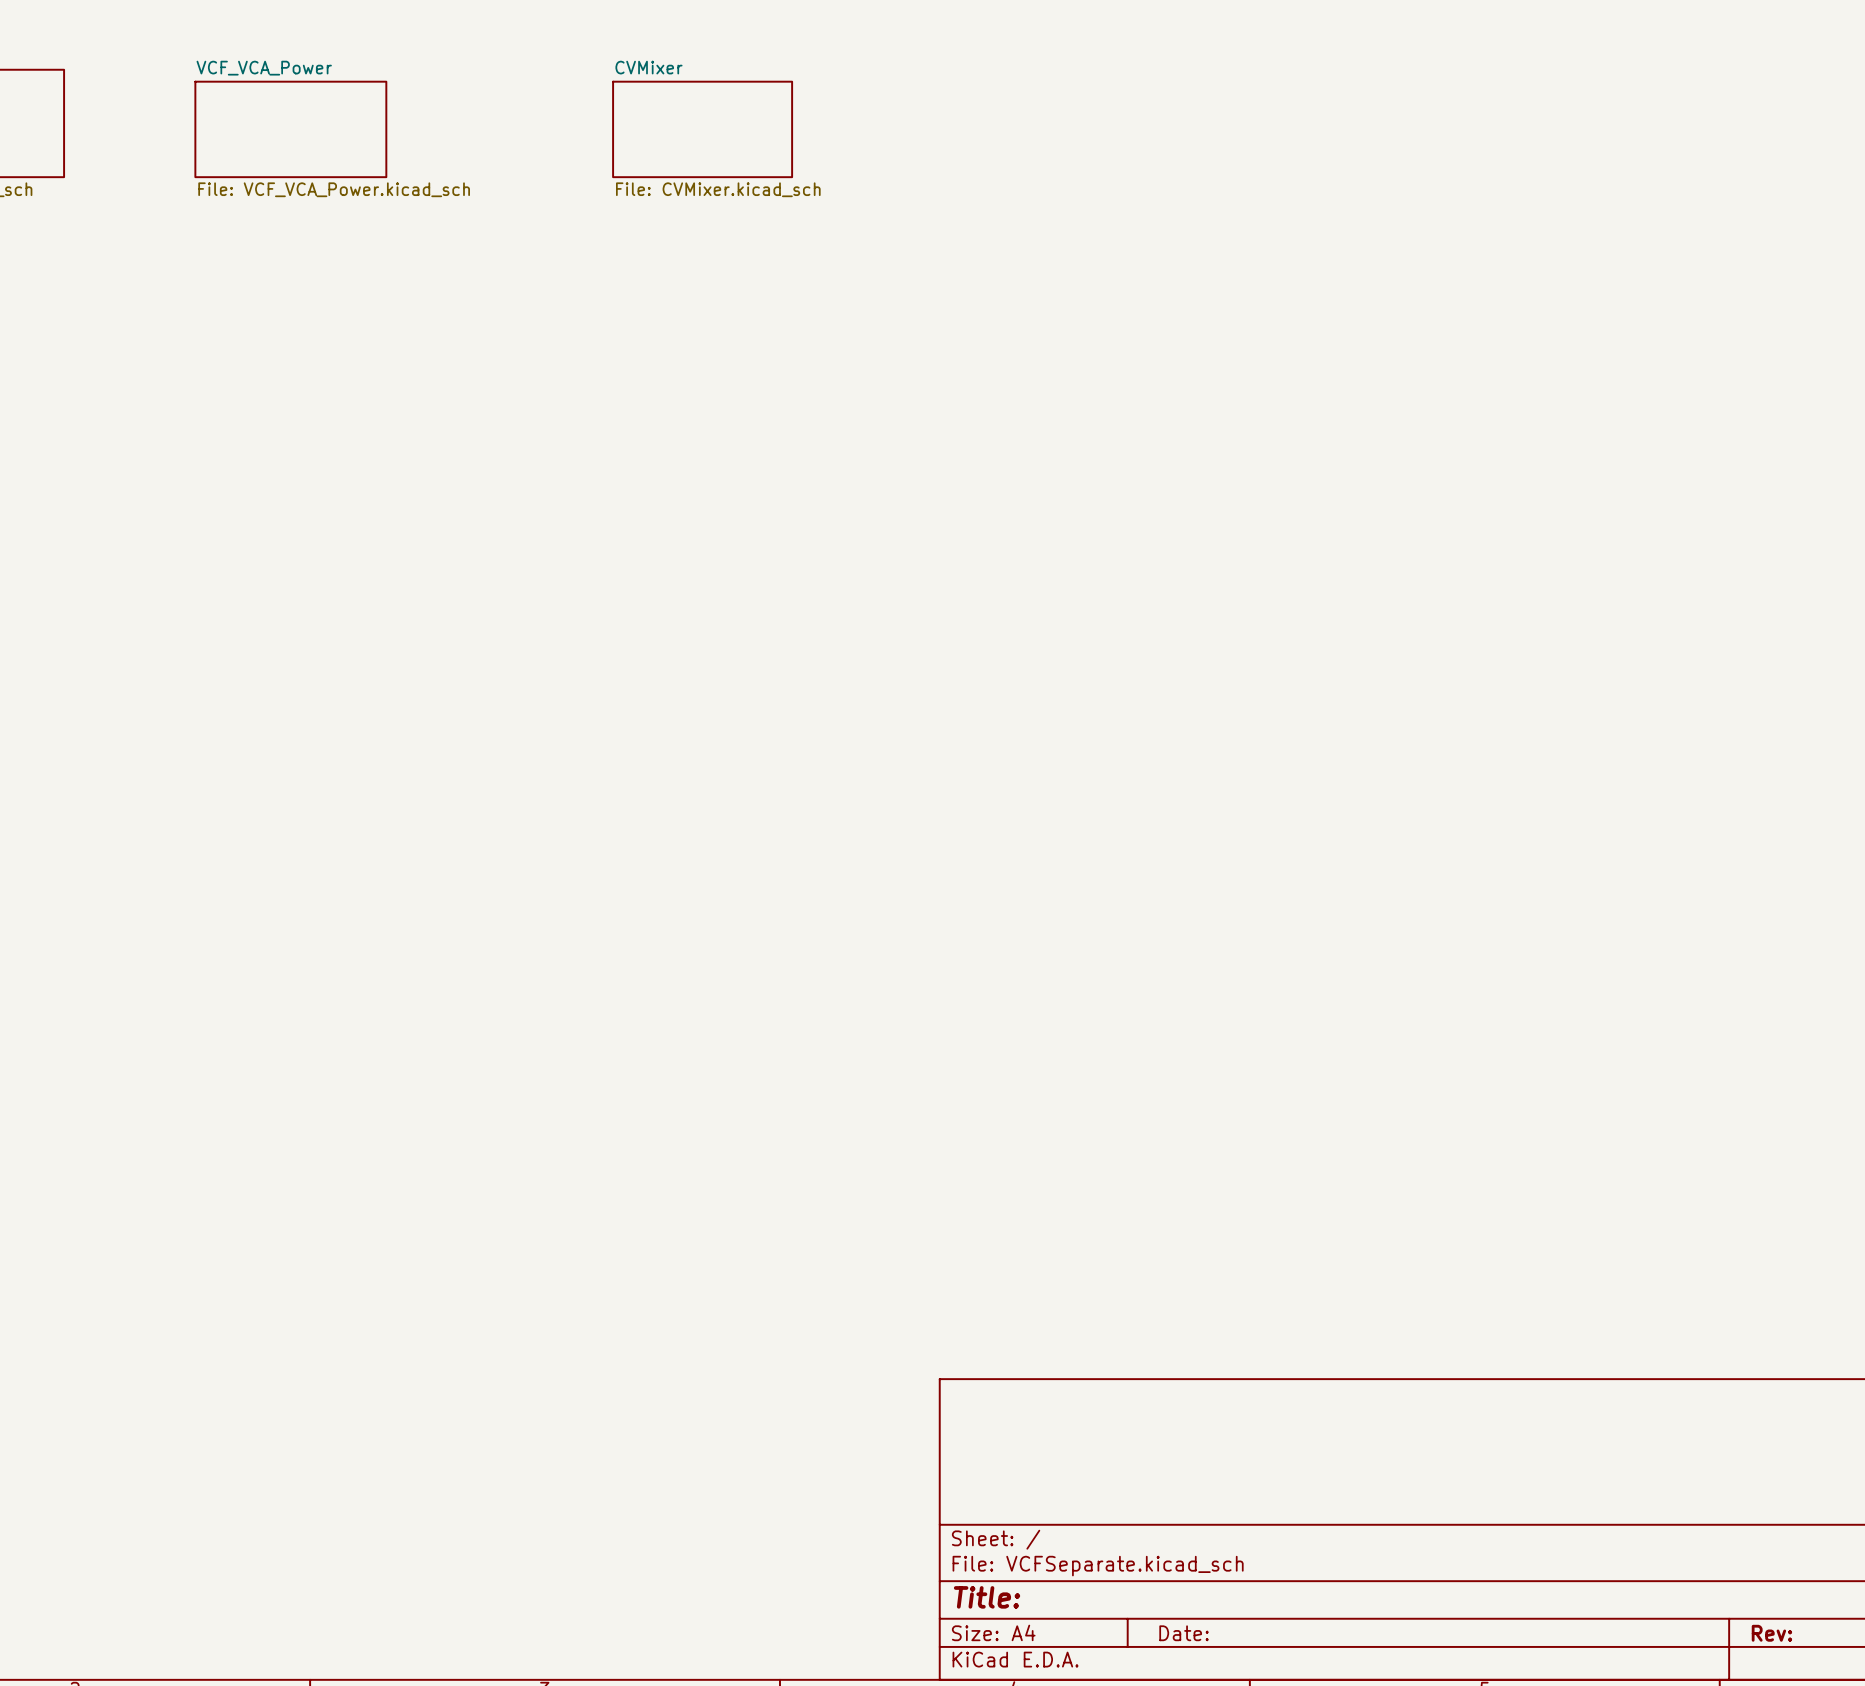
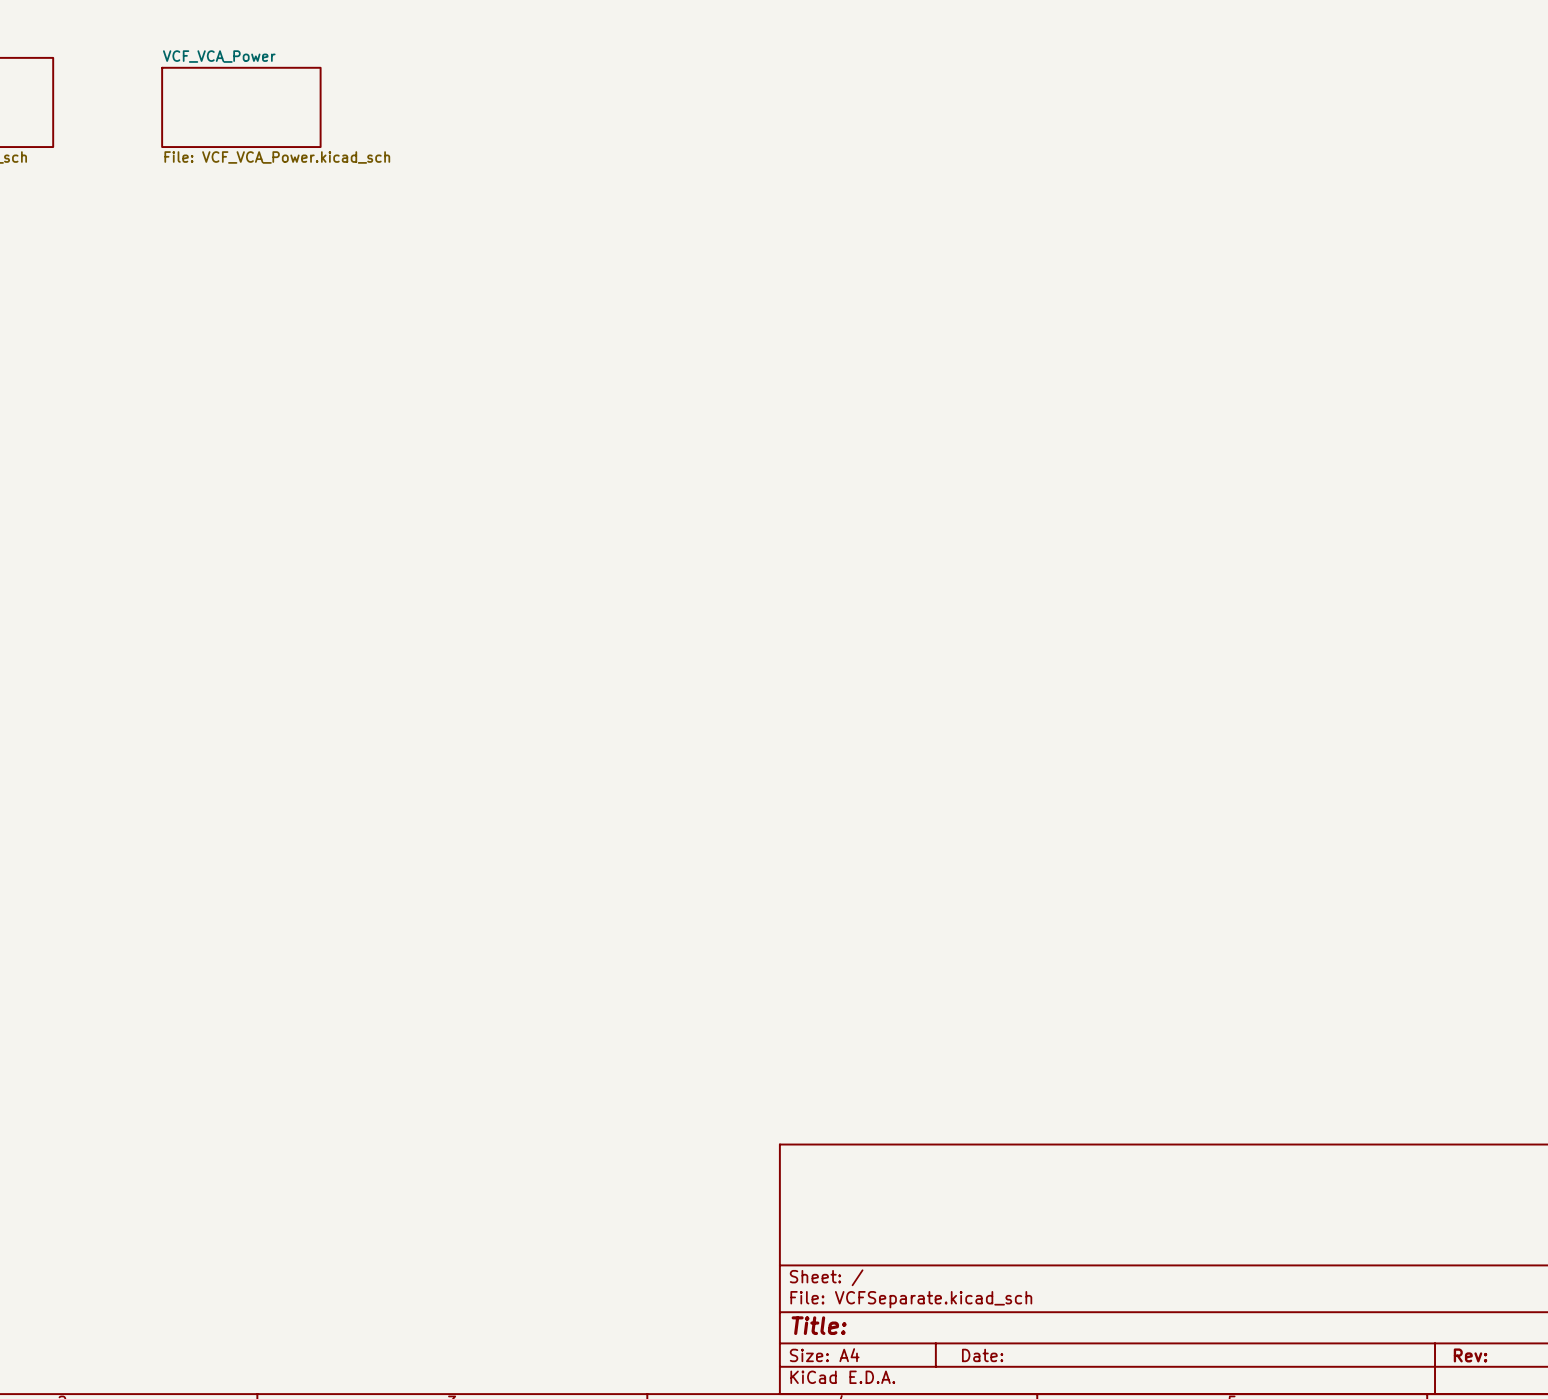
sheet CVMixer: File: CVMixer.kicad_sch (702, 129) -> none

